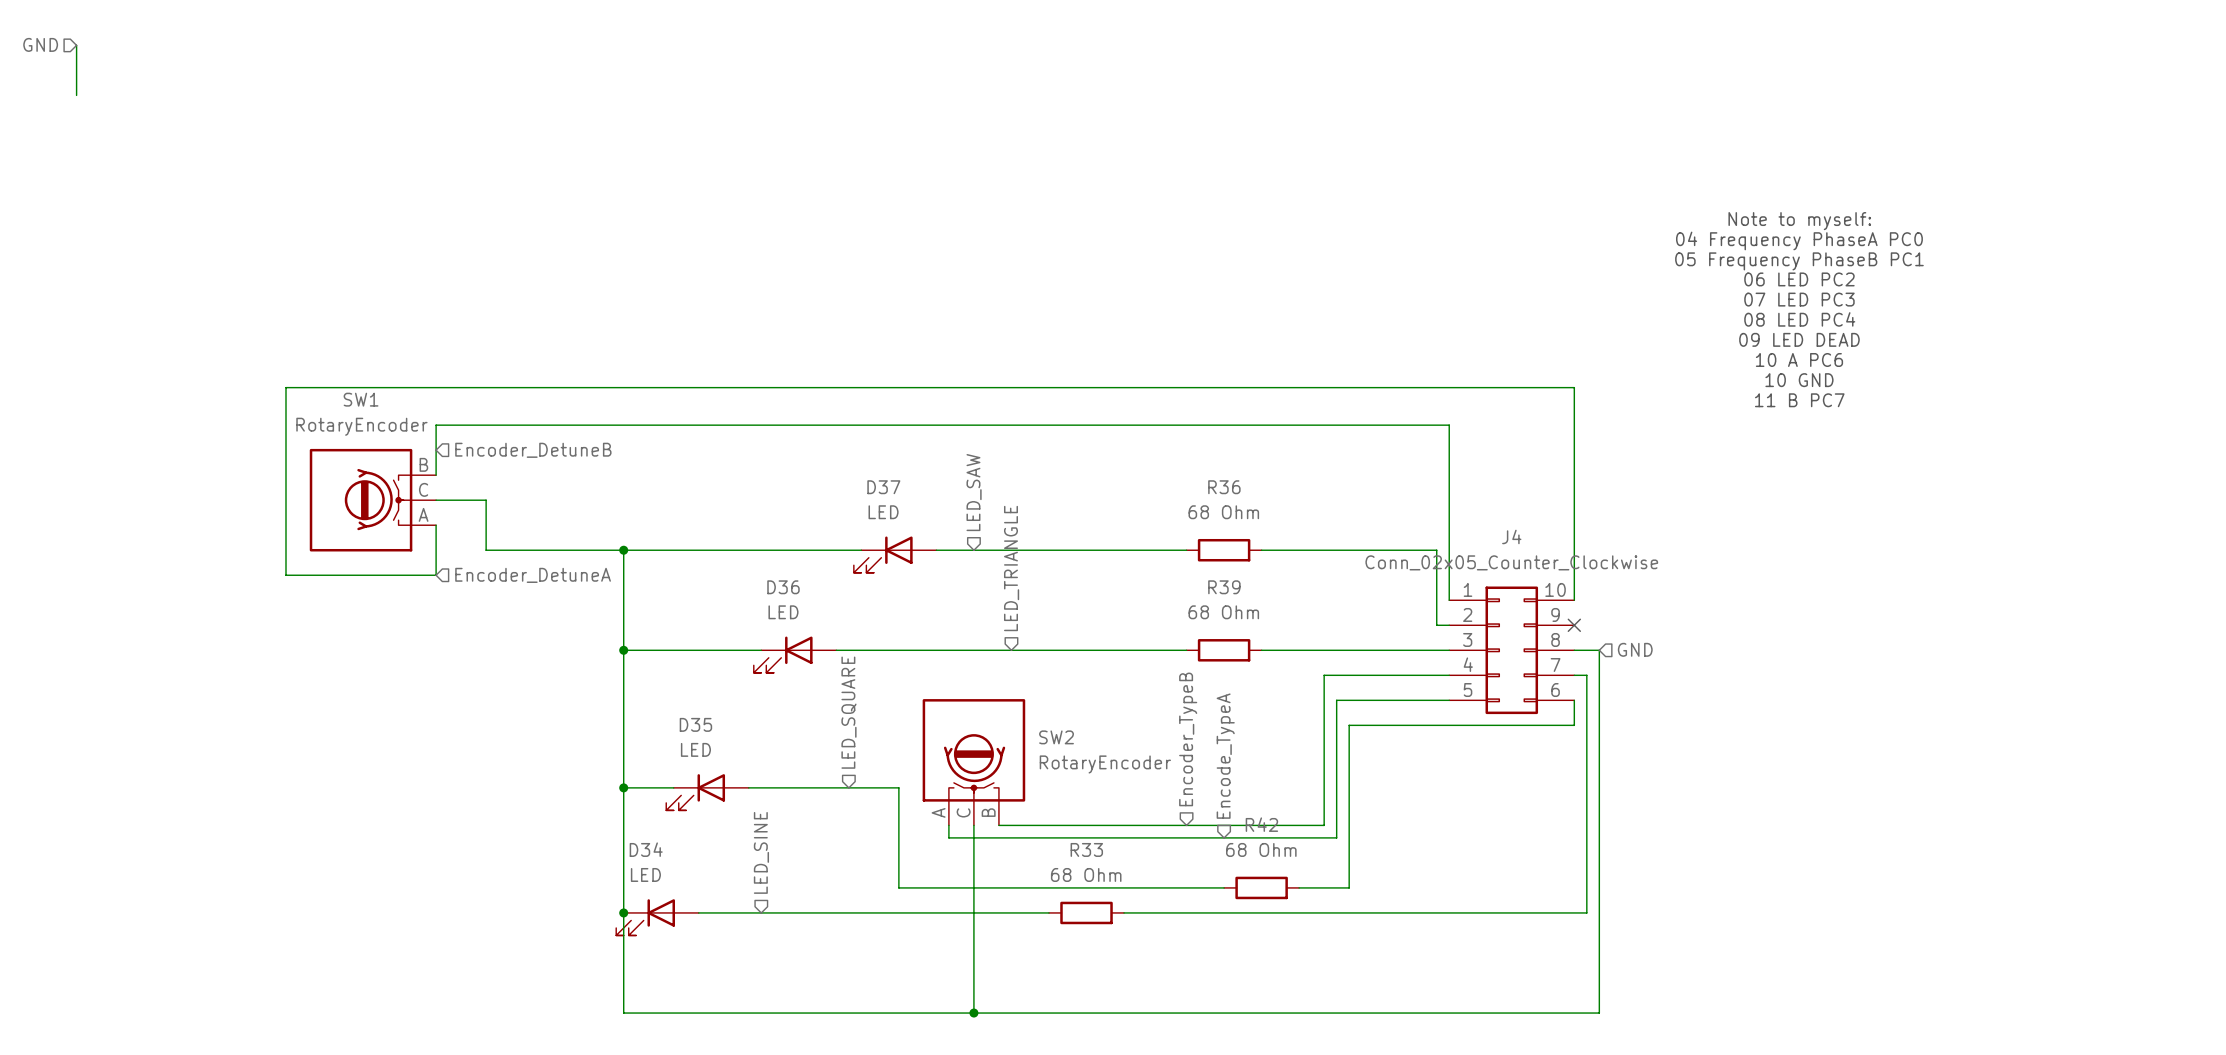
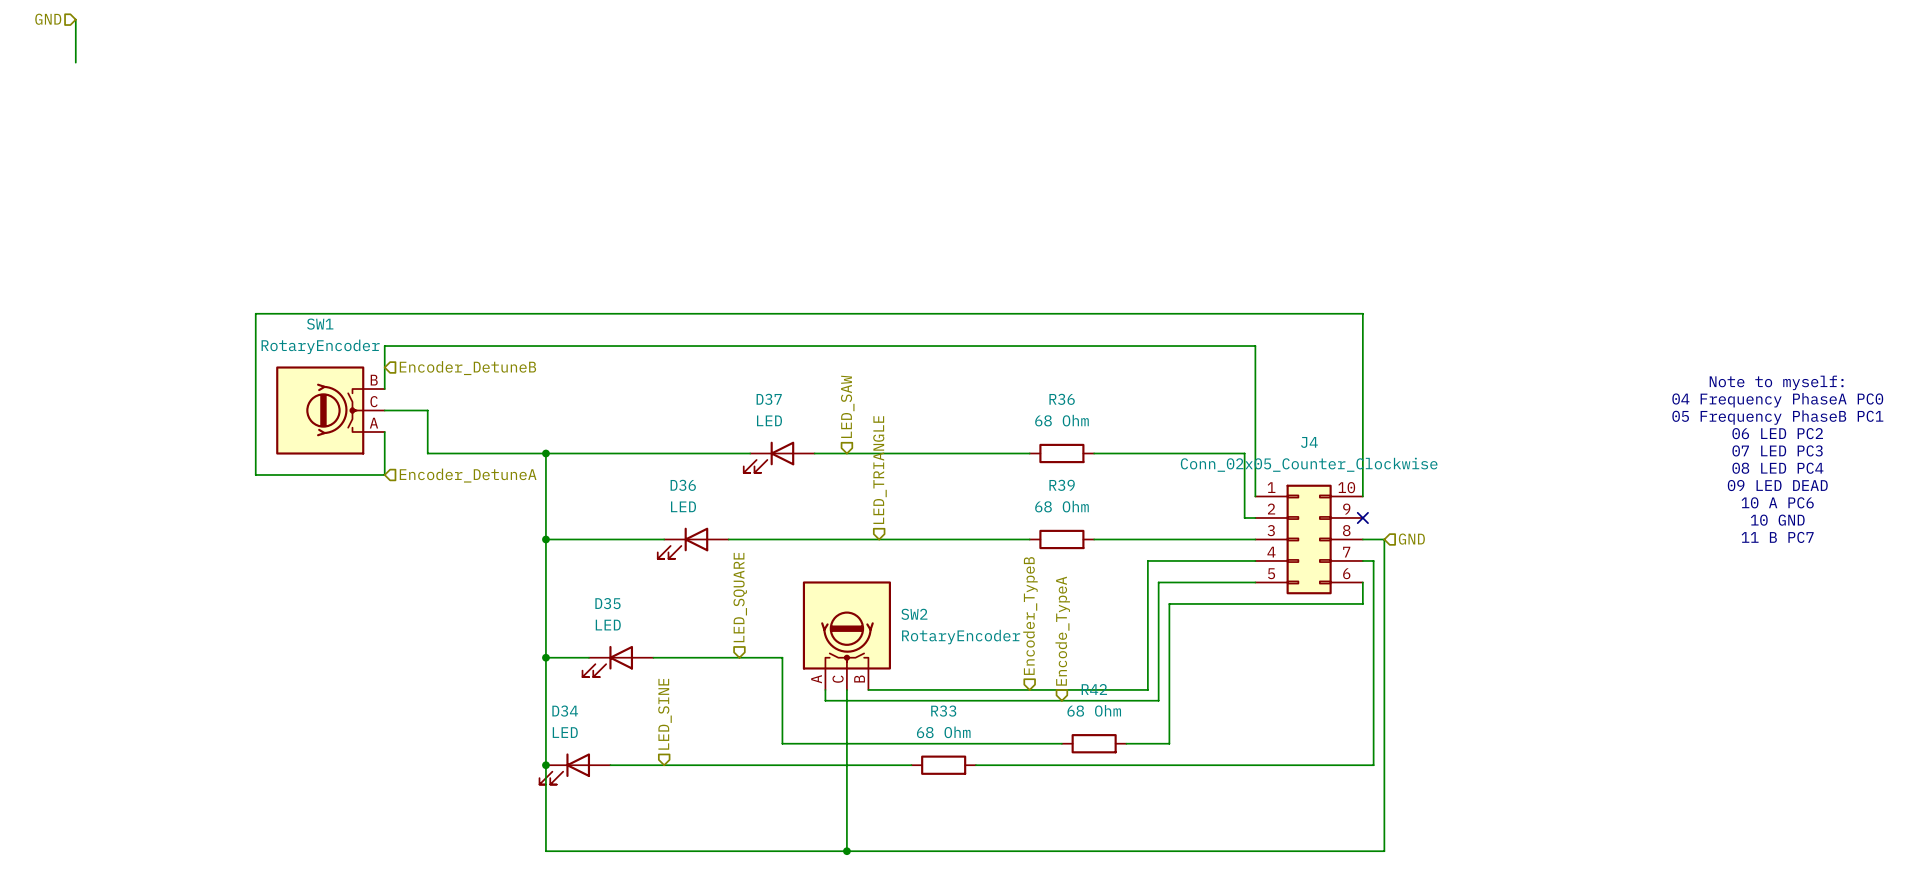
text: Note to myself: (1799, 221) -> none
text: 04 Frequency PhaseA PC0 (1799, 240) -> none
text: 05 Frequency PhaseB PC1 (1799, 261) -> none
text: 06 LED PC2 (1799, 279) -> none
text: 07 LED PC3 (1799, 299) -> none
text: 08 LED PC4 (1799, 319) -> none
text: 09 LED DEAD (1799, 339) -> none
text: 10 A PC6 (1799, 360) -> none
text: 10 GND (1799, 380) -> none
text: 11 B PC7 (1799, 400) -> none
text: none -> Note to myself: (1776, 382)
text: none -> 04 Frequency PhaseA PC0 (1777, 400)
text: none -> 05 Frequency PhaseB PC1 (1777, 417)
text: none -> 06 LED PC2 (1777, 433)
text: none -> 07 LED PC3 (1777, 450)
text: none -> 08 LED PC4 (1777, 468)
text: none -> 09 LED DEAD (1777, 485)
text: none -> 10 A PC6 (1777, 502)
text: none -> 10 GND (1777, 520)
text: none -> 11 B PC7 (1777, 537)

